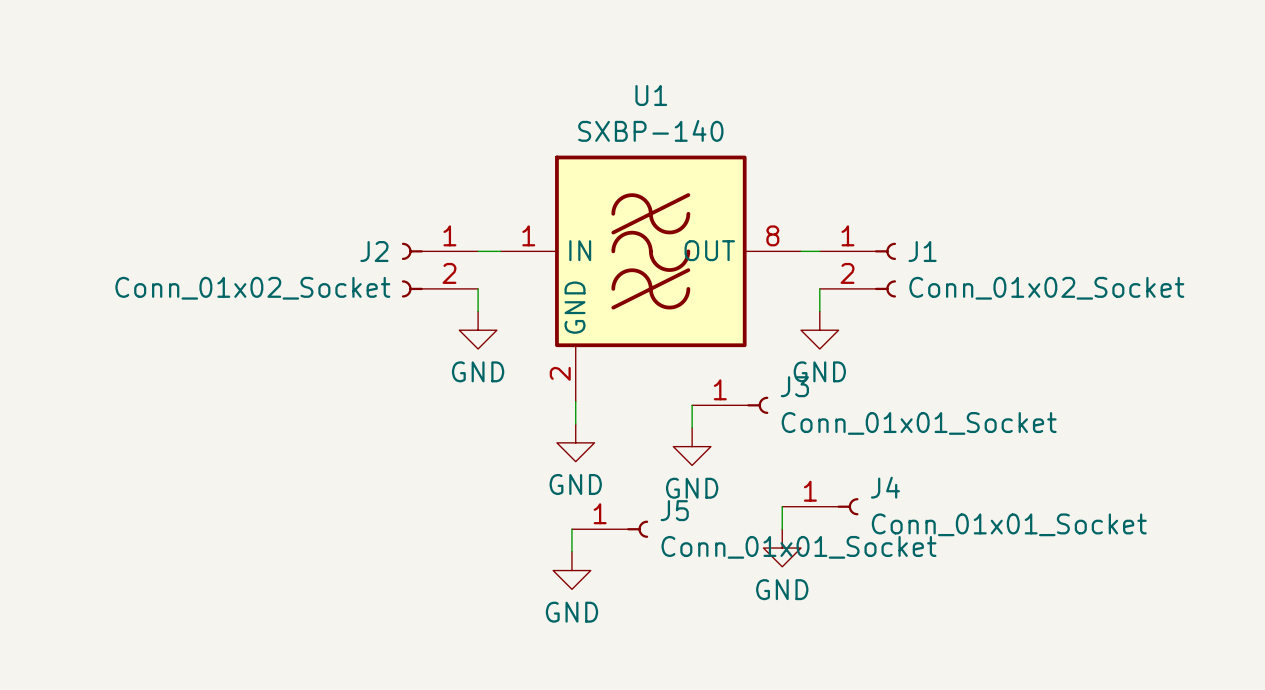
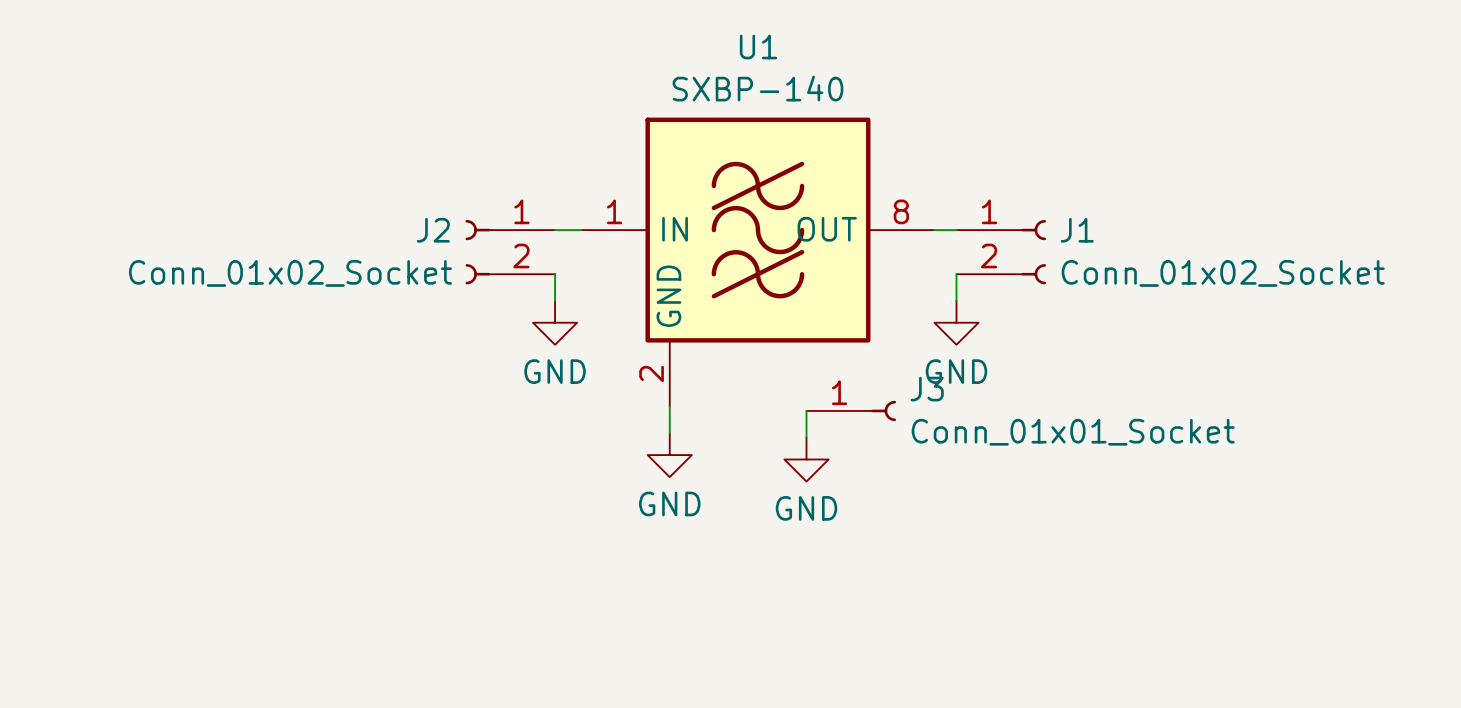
wire: (782, 506) (782, 529) -> none
J4: Conn_01x01_Socket (820, 506) -> none
wire: (571, 529) (571, 551) -> none
J5: Conn_01x01_Socket (610, 529) -> none
power symbol: GND (782, 548) -> none
power symbol: GND (571, 570) -> none

